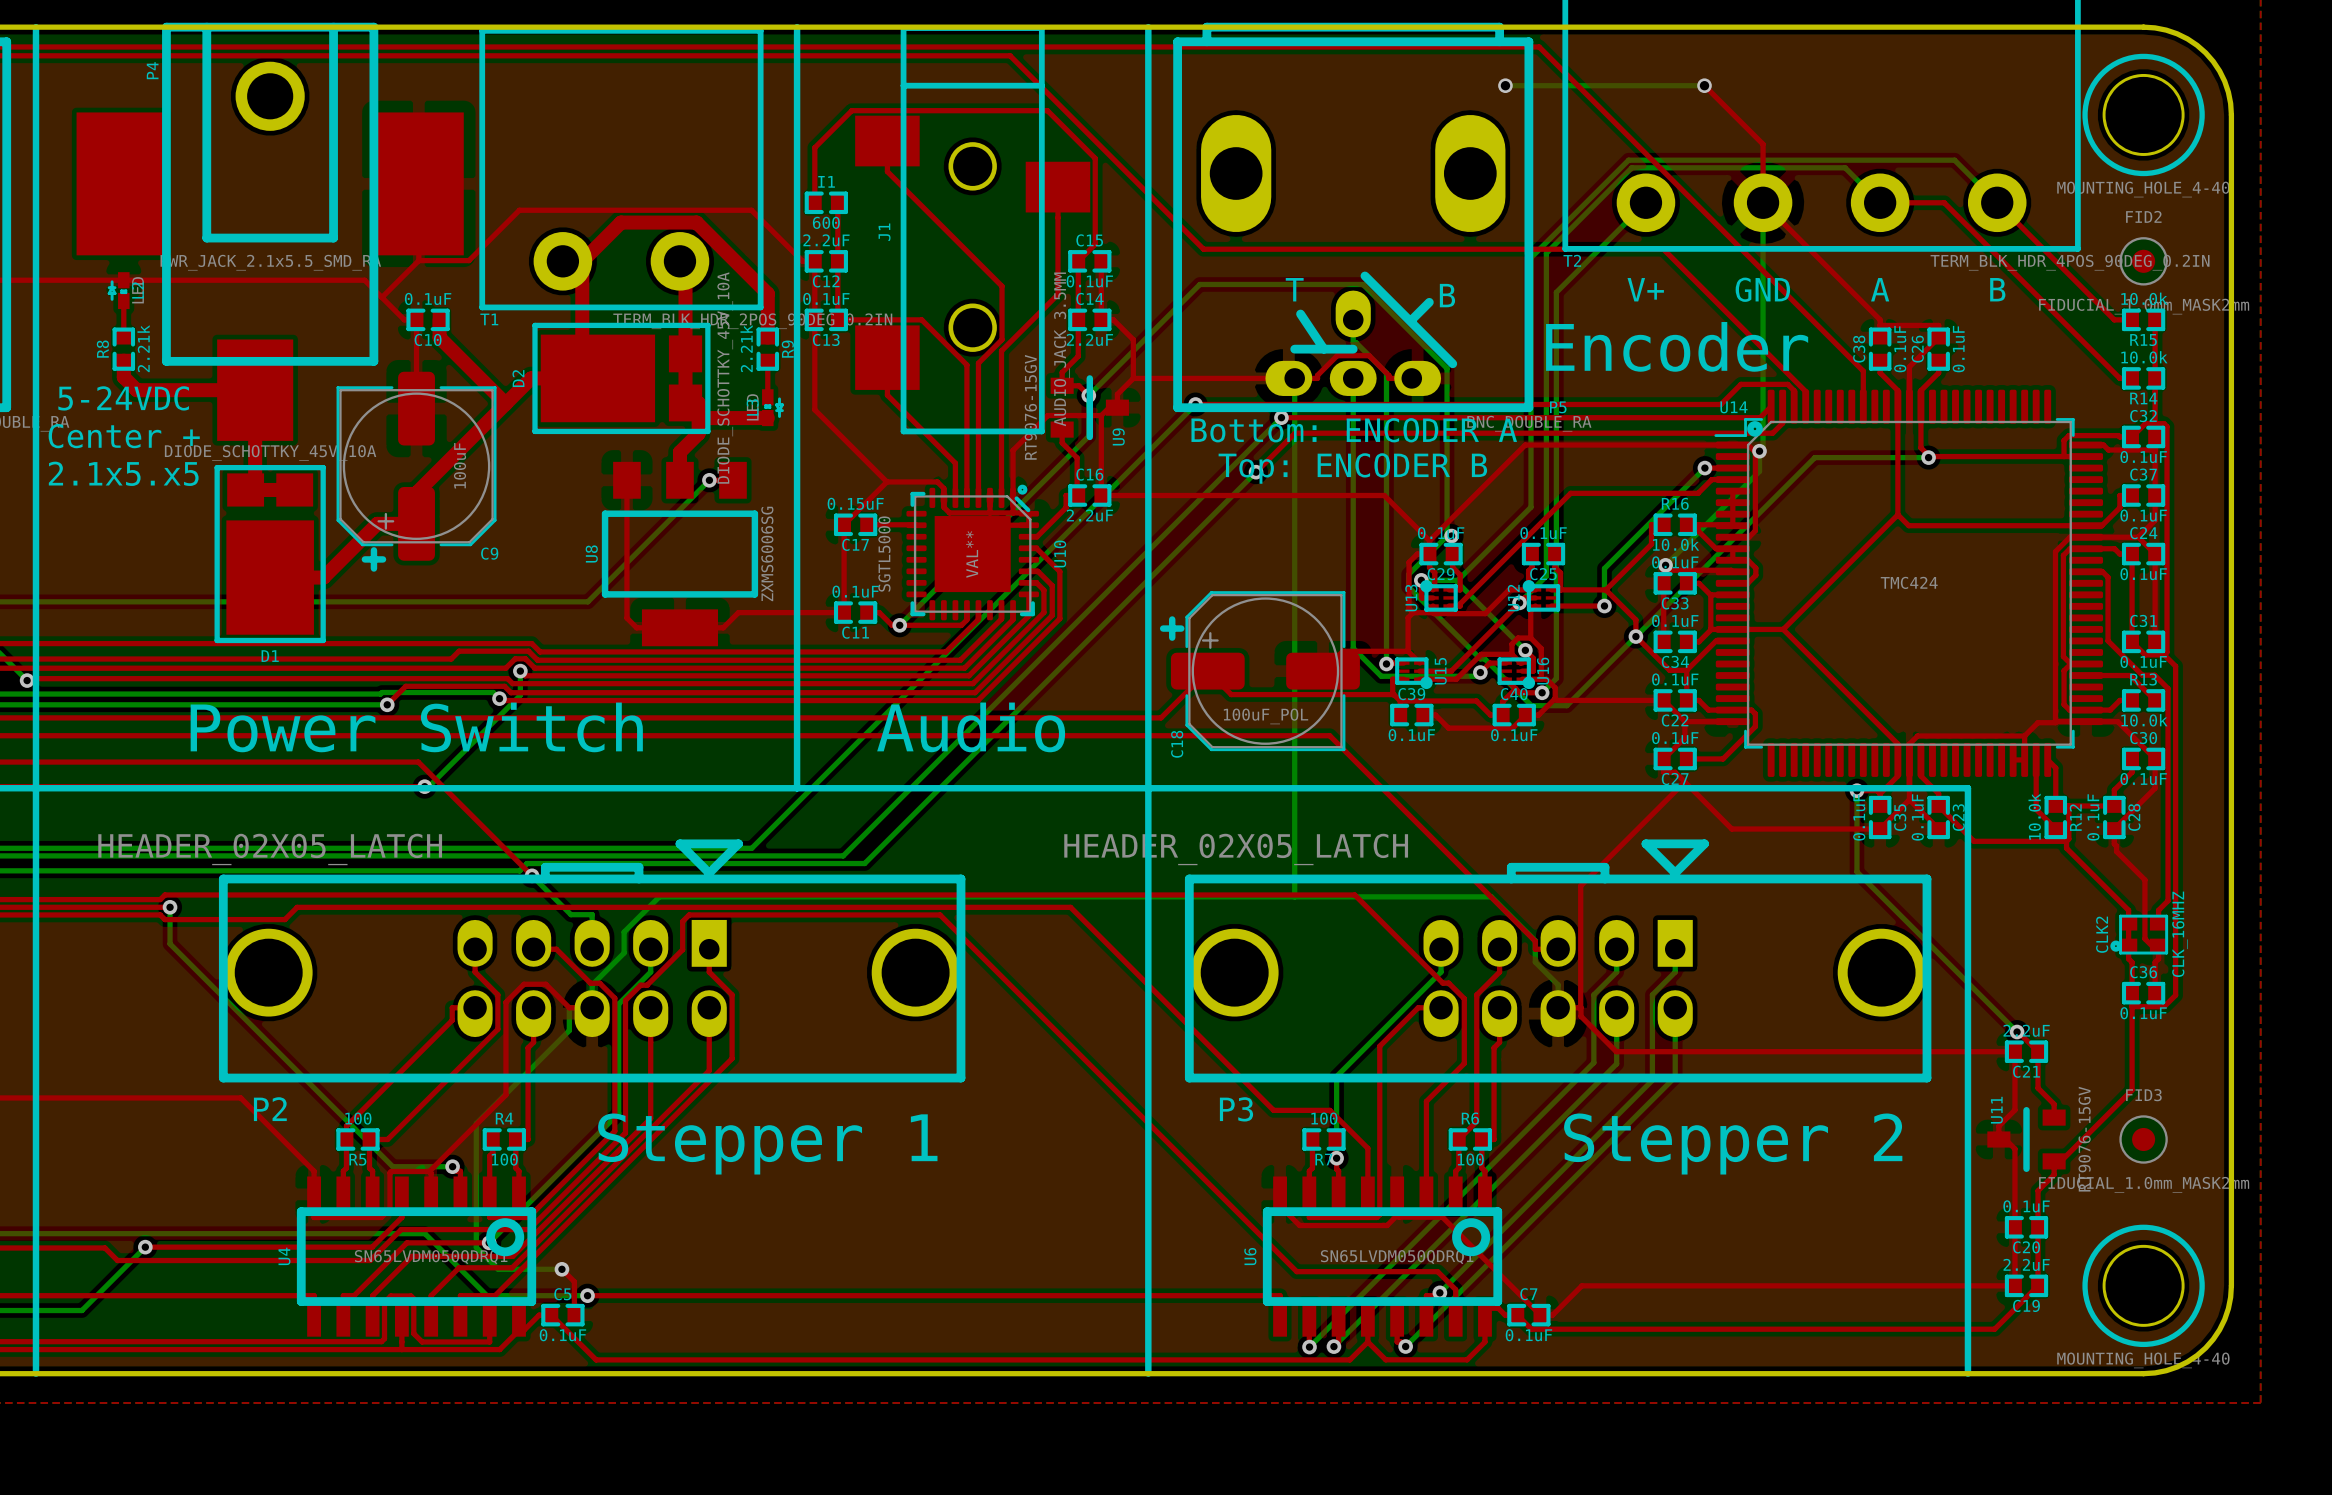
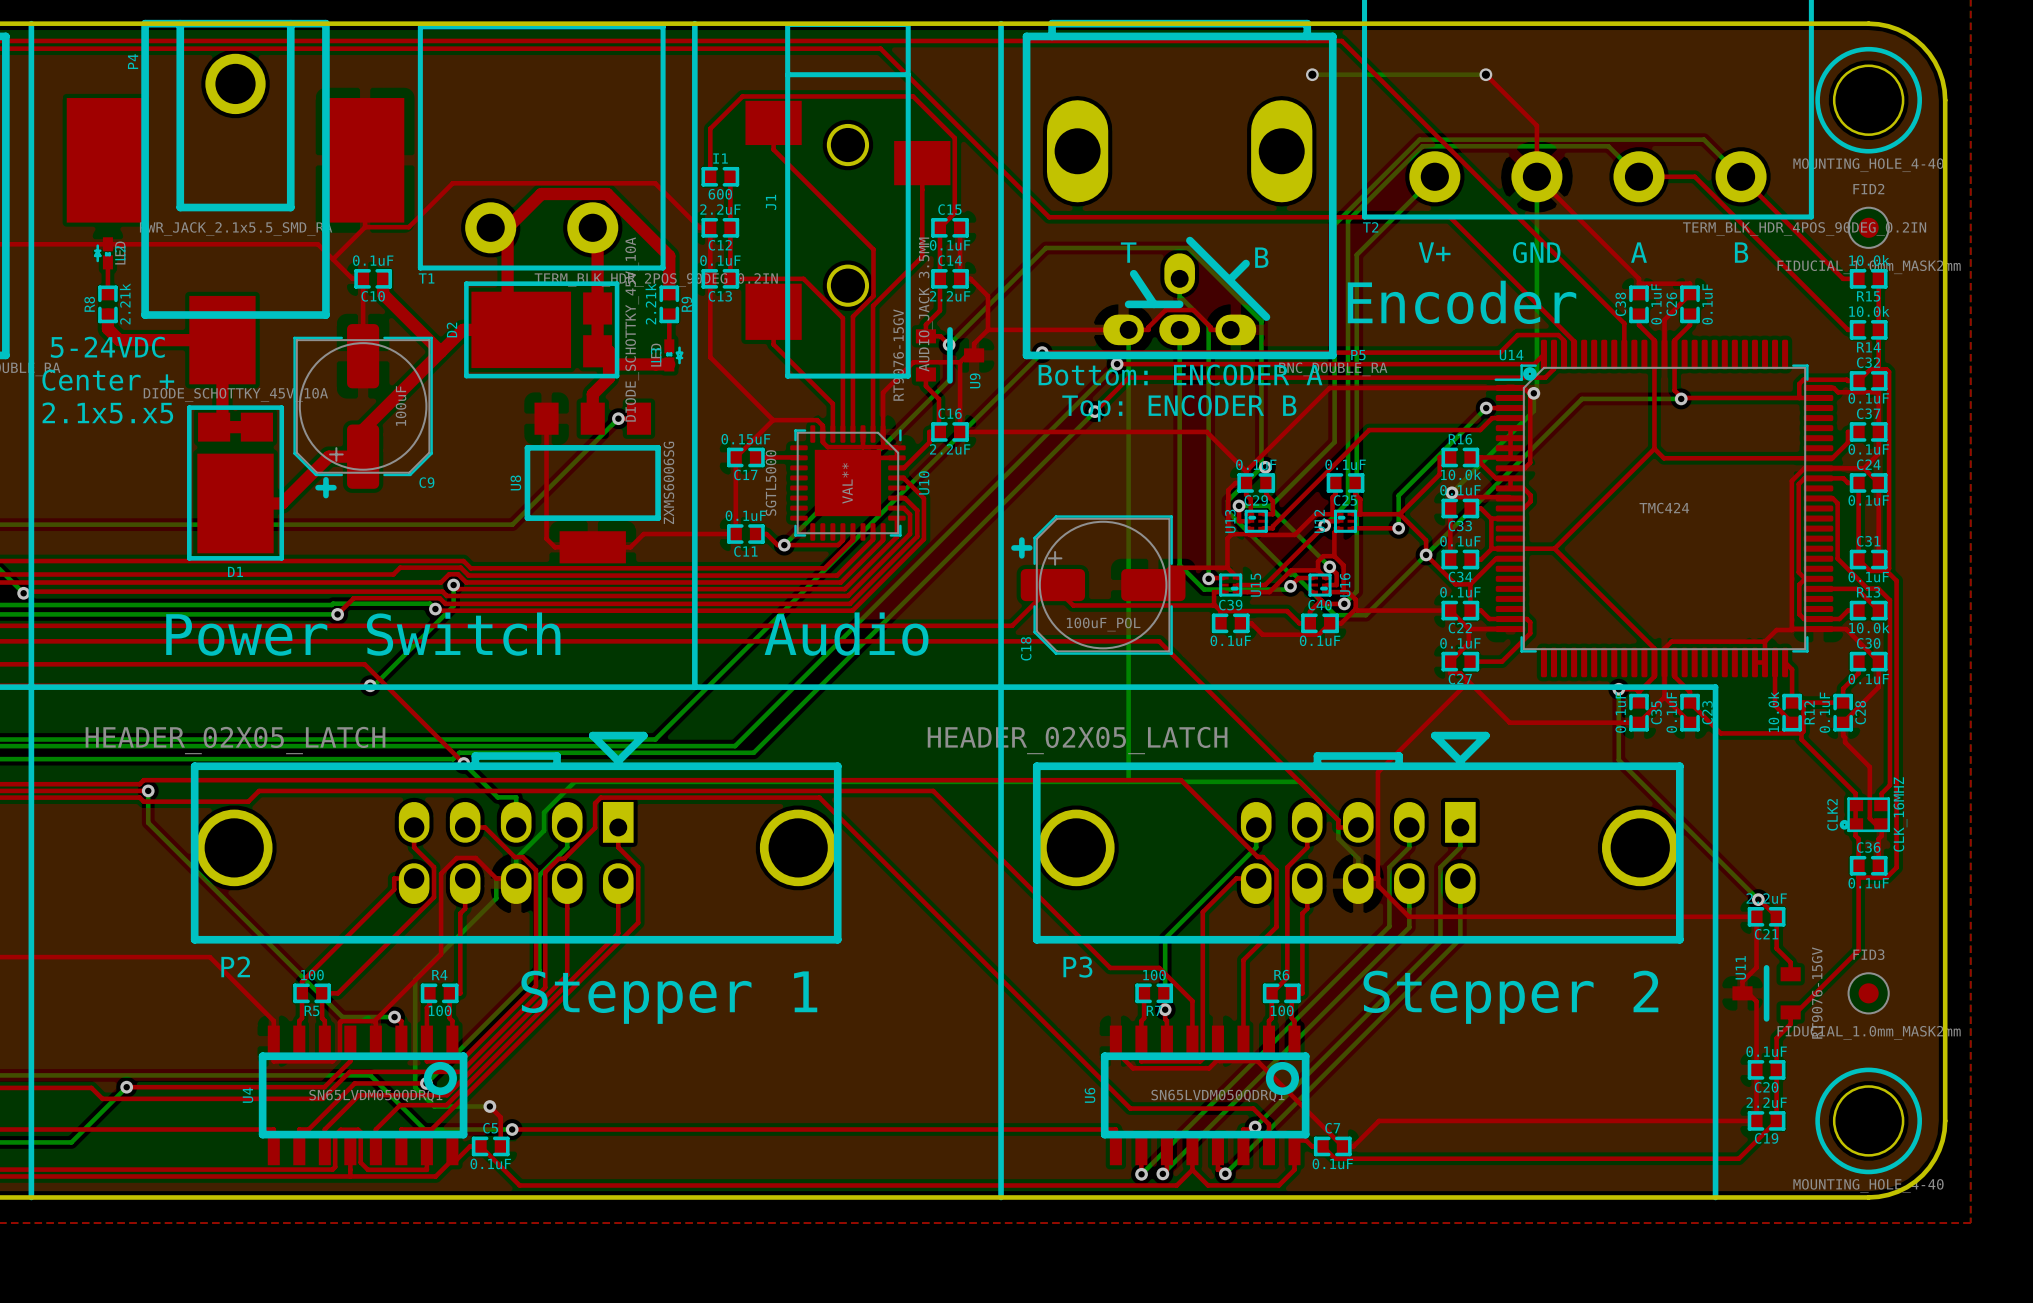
U10 footprint: [906, 484, 1039, 621] -> [790, 425, 906, 541]
U13 footprint: [1420, 580, 1458, 612] -> [1244, 509, 1269, 533]
U12 footprint: [1522, 580, 1561, 612] -> [1333, 509, 1358, 533]
U15 footprint: [1395, 657, 1433, 690] -> [1218, 573, 1243, 597]
U16 footprint: [1497, 657, 1536, 690] -> [1307, 573, 1333, 597]

